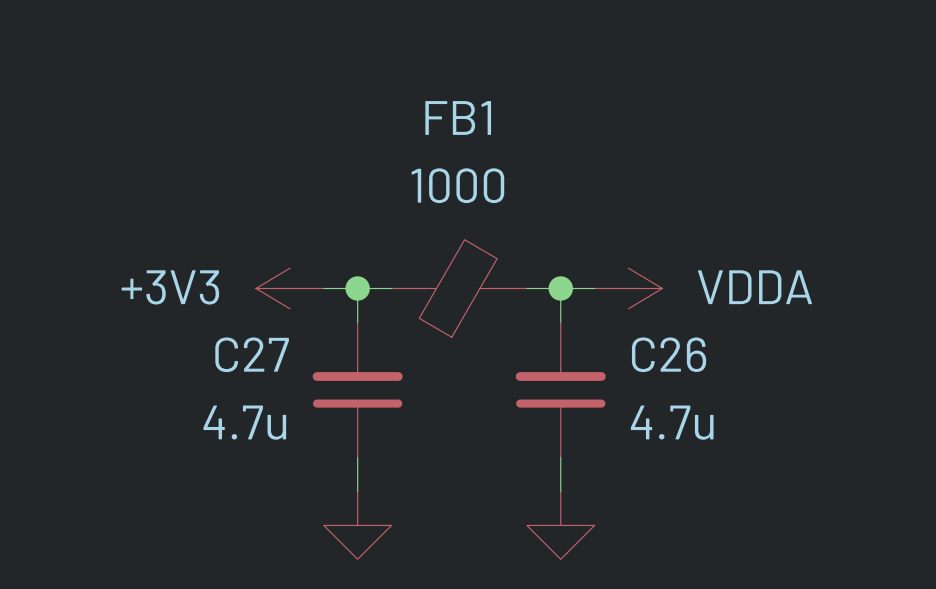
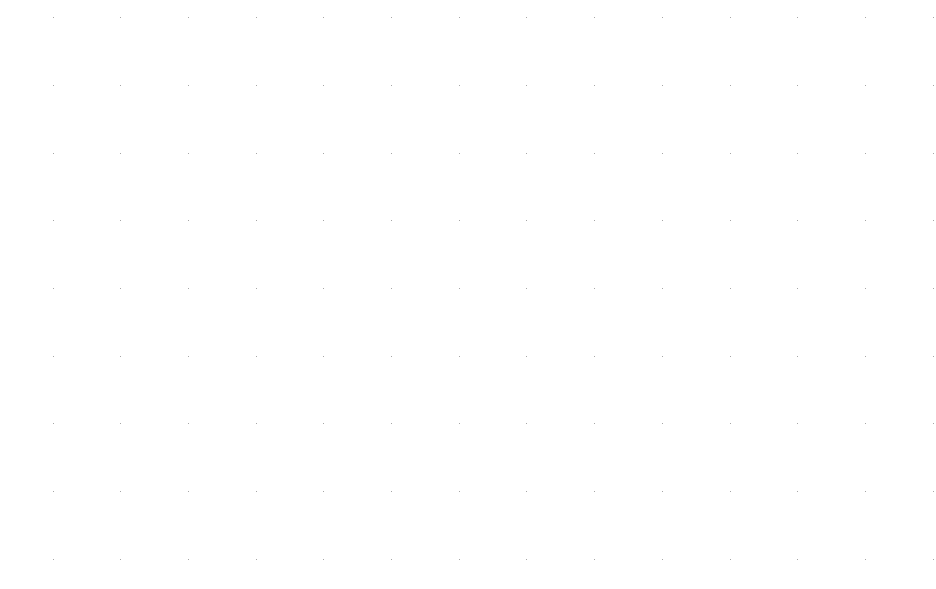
power symbol: +3V3 (289, 288) -> none
wire: (323, 288) (391, 288) -> none
wire: (357, 288) (357, 322) -> none
junction: (357, 288) -> none
FB1: 1000 (459, 288) -> none
wire: (526, 288) (594, 288) -> none
wire: (560, 288) (560, 322) -> none
junction: (560, 288) -> none
power symbol: VDDA (628, 288) -> none
C27: 4.7u (357, 390) -> none
C26: 4.7u (560, 390) -> none
wire: (357, 457) (357, 491) -> none
wire: (560, 457) (560, 491) -> none
power symbol: (357, 525) -> none
power symbol: (560, 525) -> none

